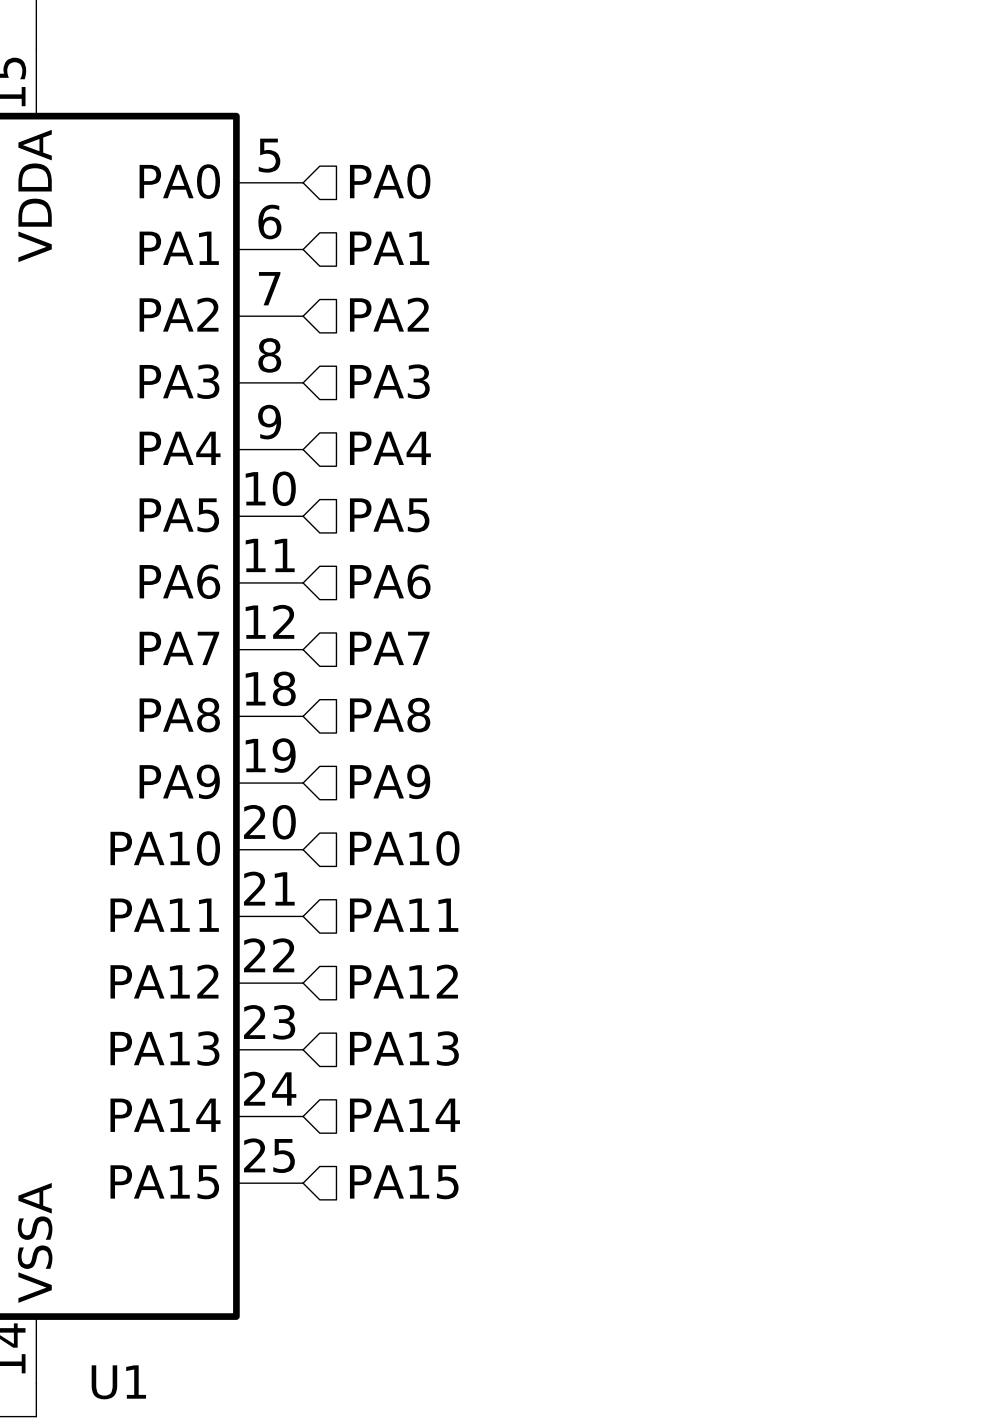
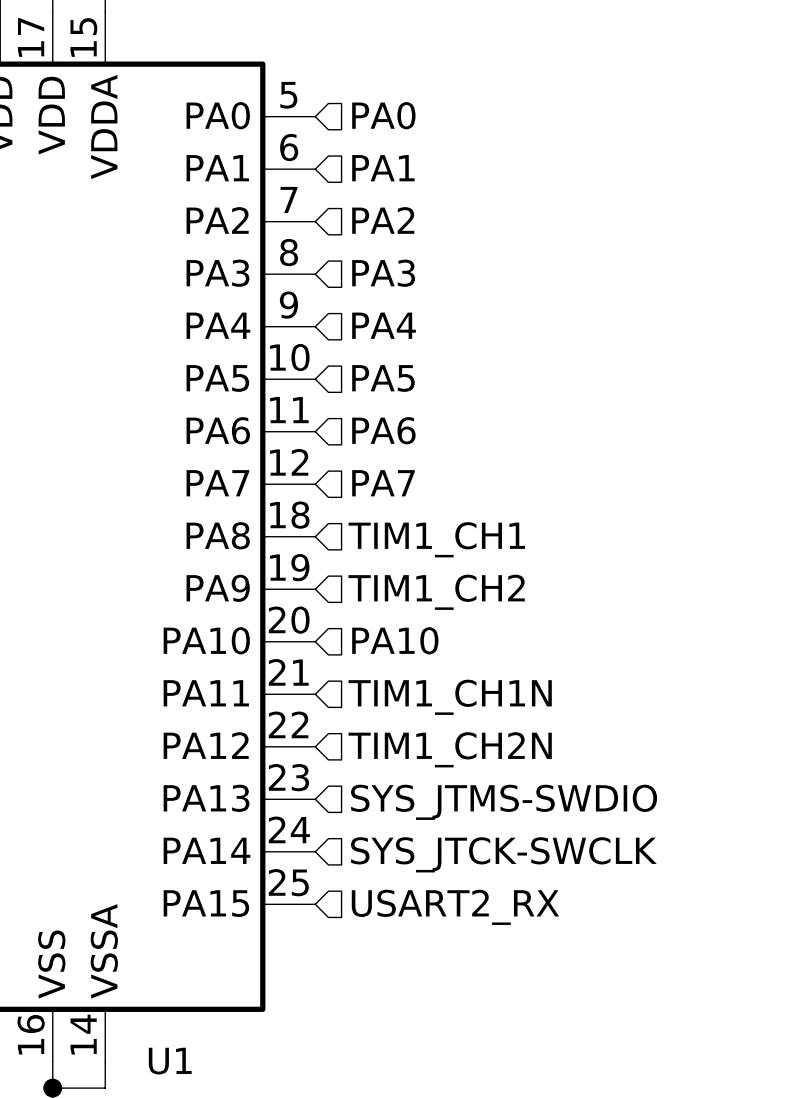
hierarchical label: PA8 (390, 715) -> TIM1_CH1 (436, 539)
hierarchical label: PA9 (390, 781) -> TIM1_CH2 (436, 592)
hierarchical label: PA11 (404, 915) -> TIM1_CH1N (450, 697)
hierarchical label: PA12 (403, 981) -> TIM1_CH2N (450, 749)
hierarchical label: PA13 (404, 1048) -> SYS_JTMS-SWDIO (504, 802)
hierarchical label: PA14 (404, 1115) -> SYS_JTCK-SWCLK (503, 854)
hierarchical label: PA15 (404, 1182) -> USART2_RX (455, 907)

